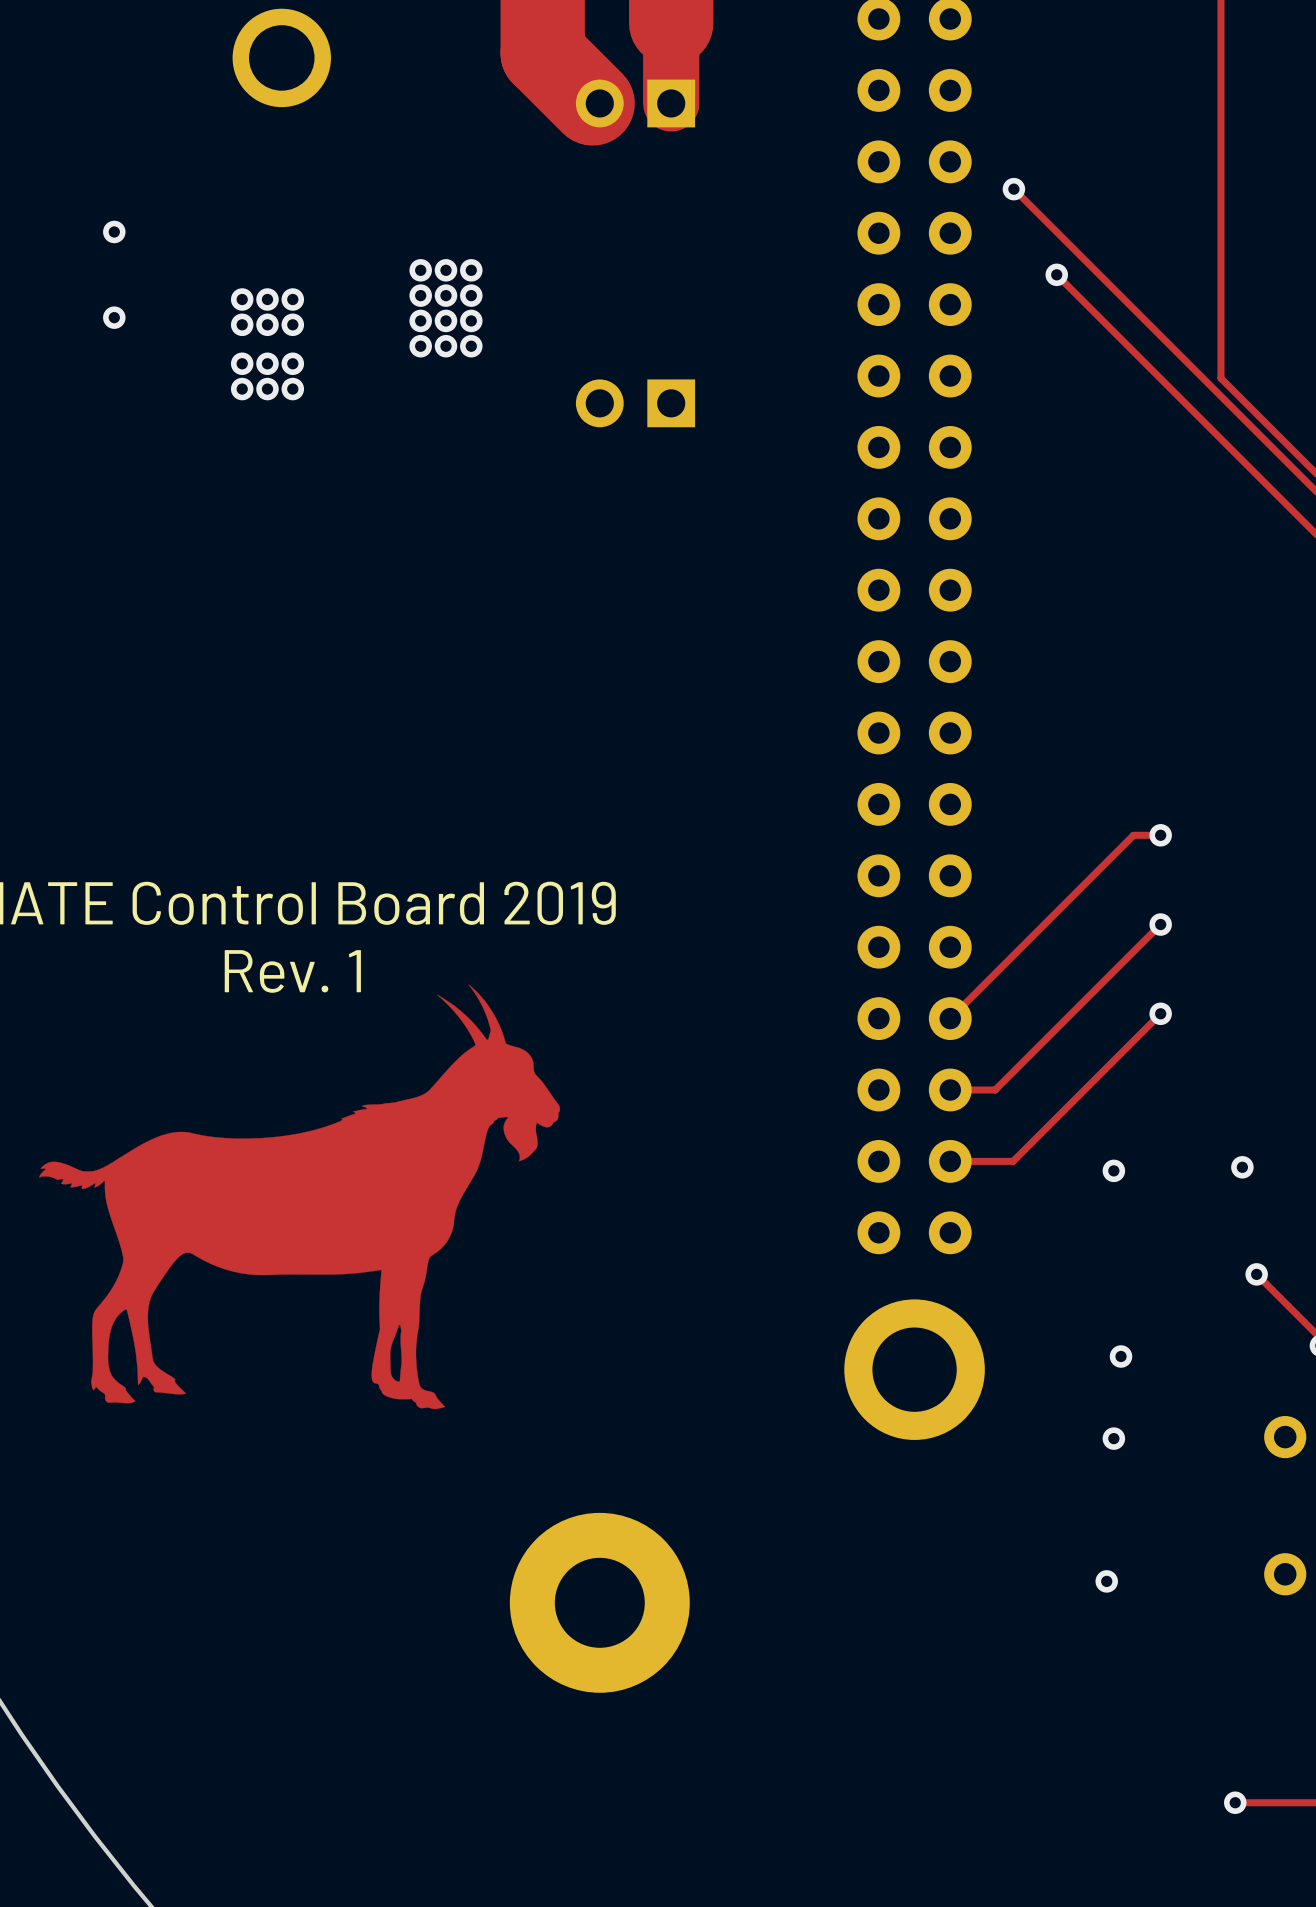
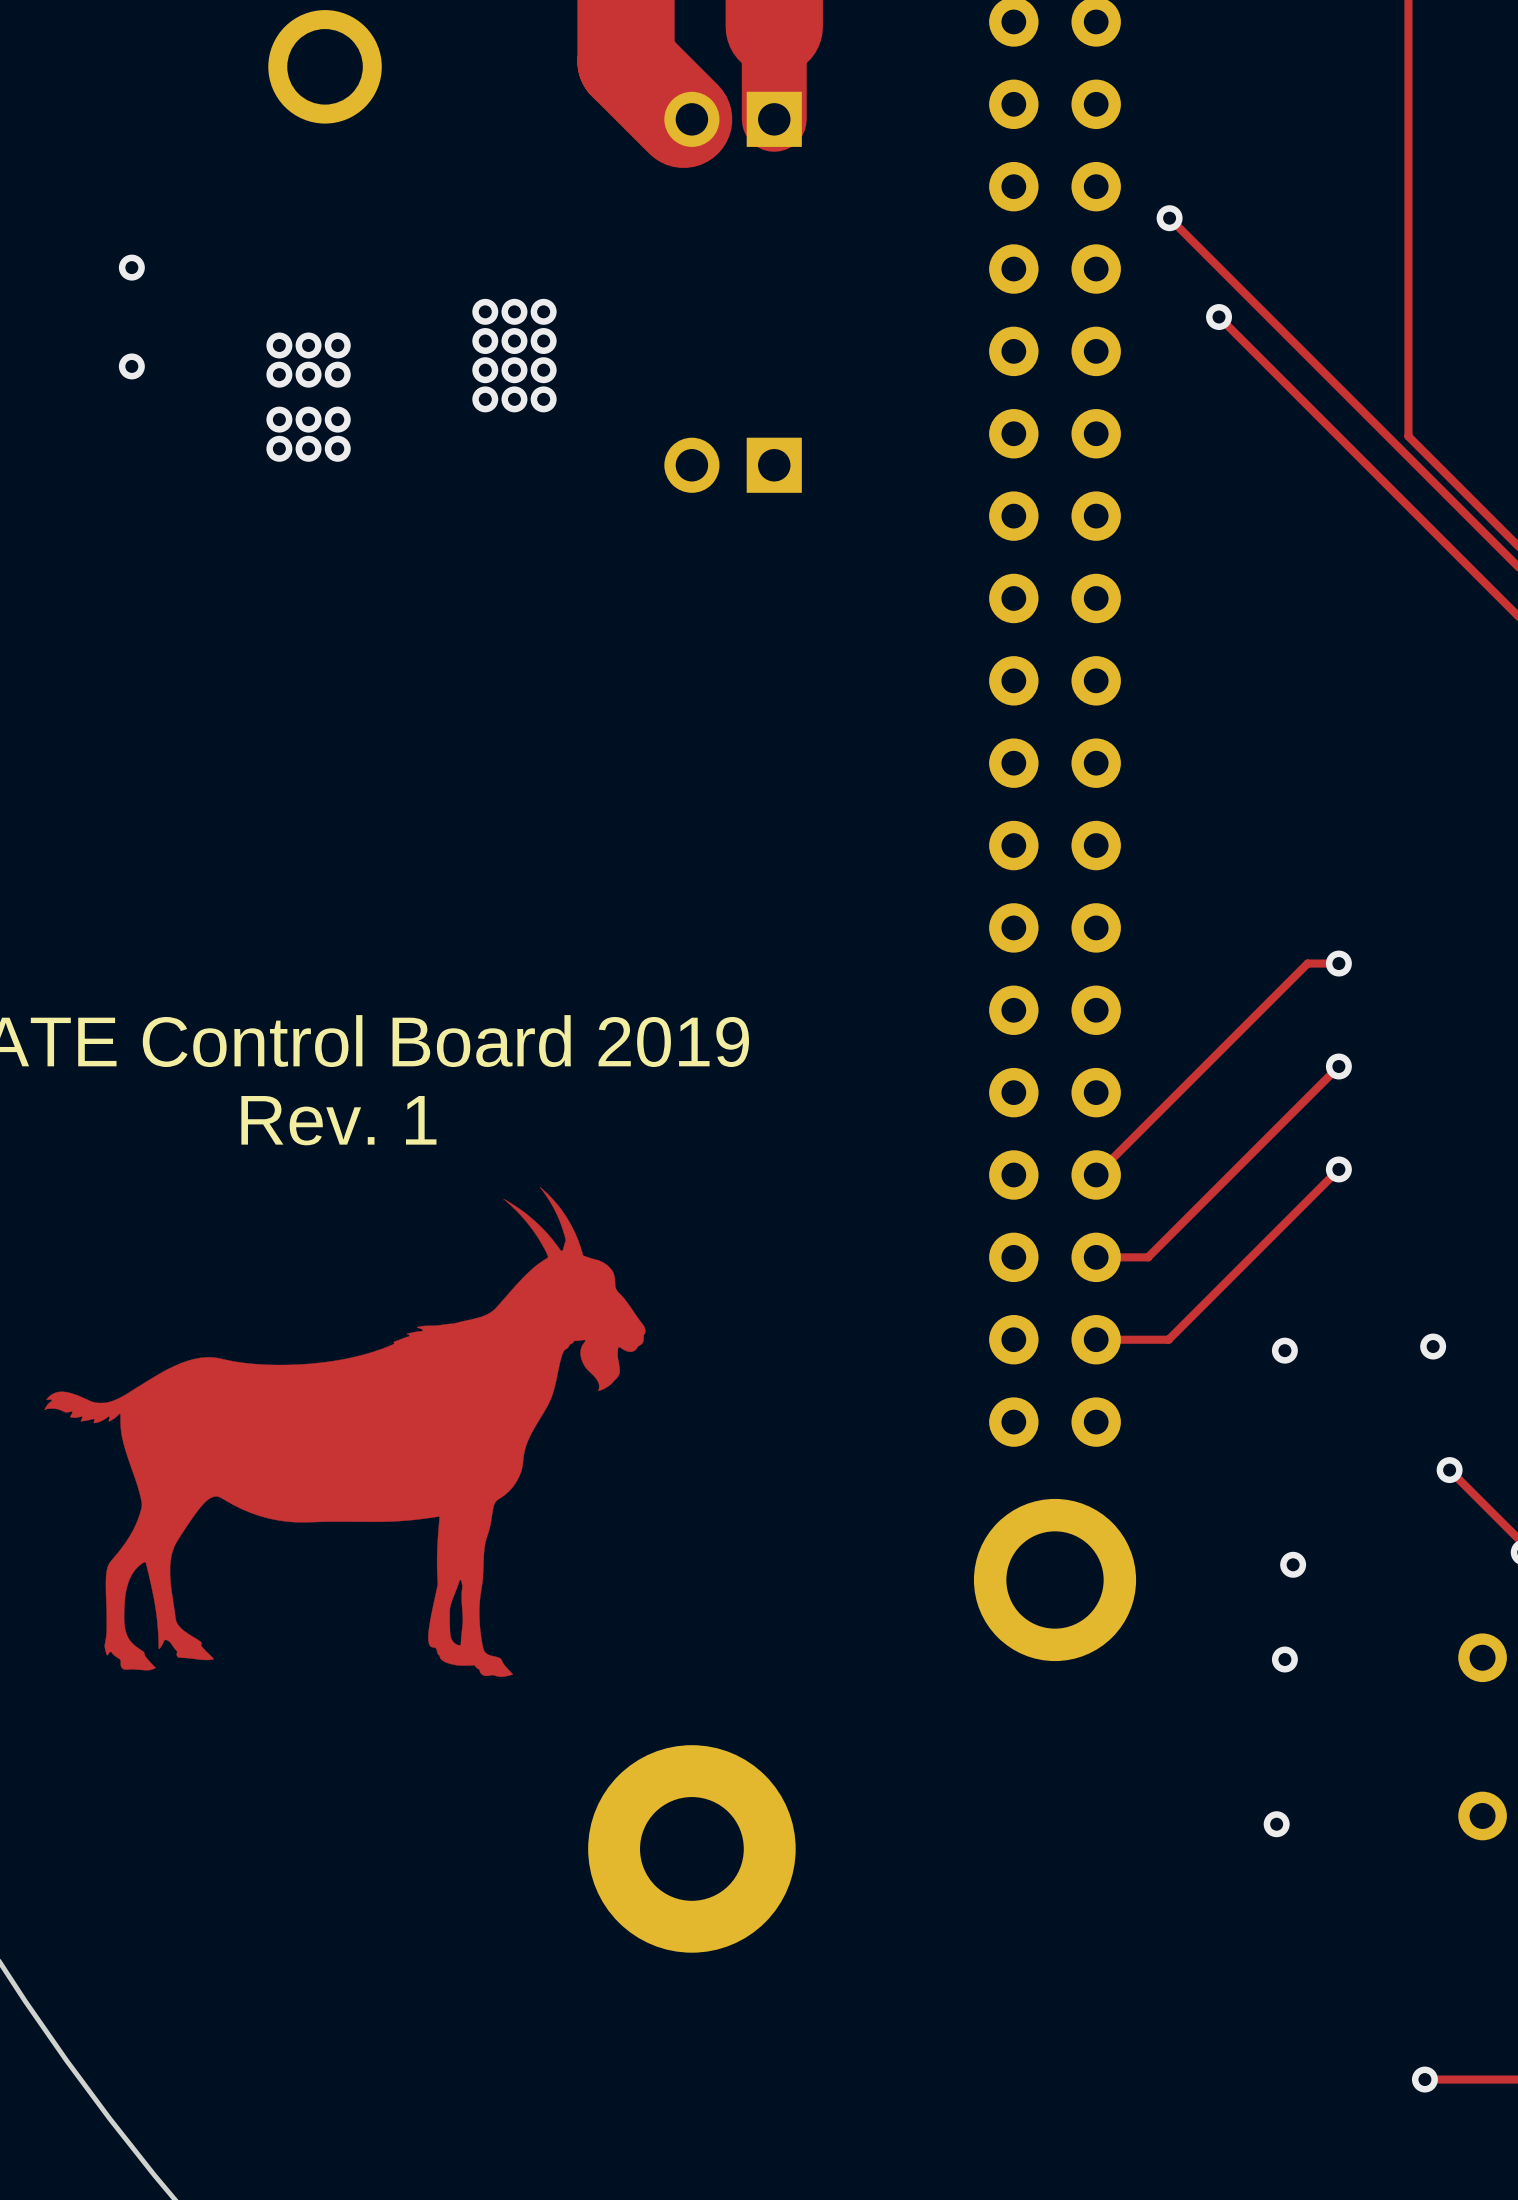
drawing position: (299, 1196) -> (345, 1432)

